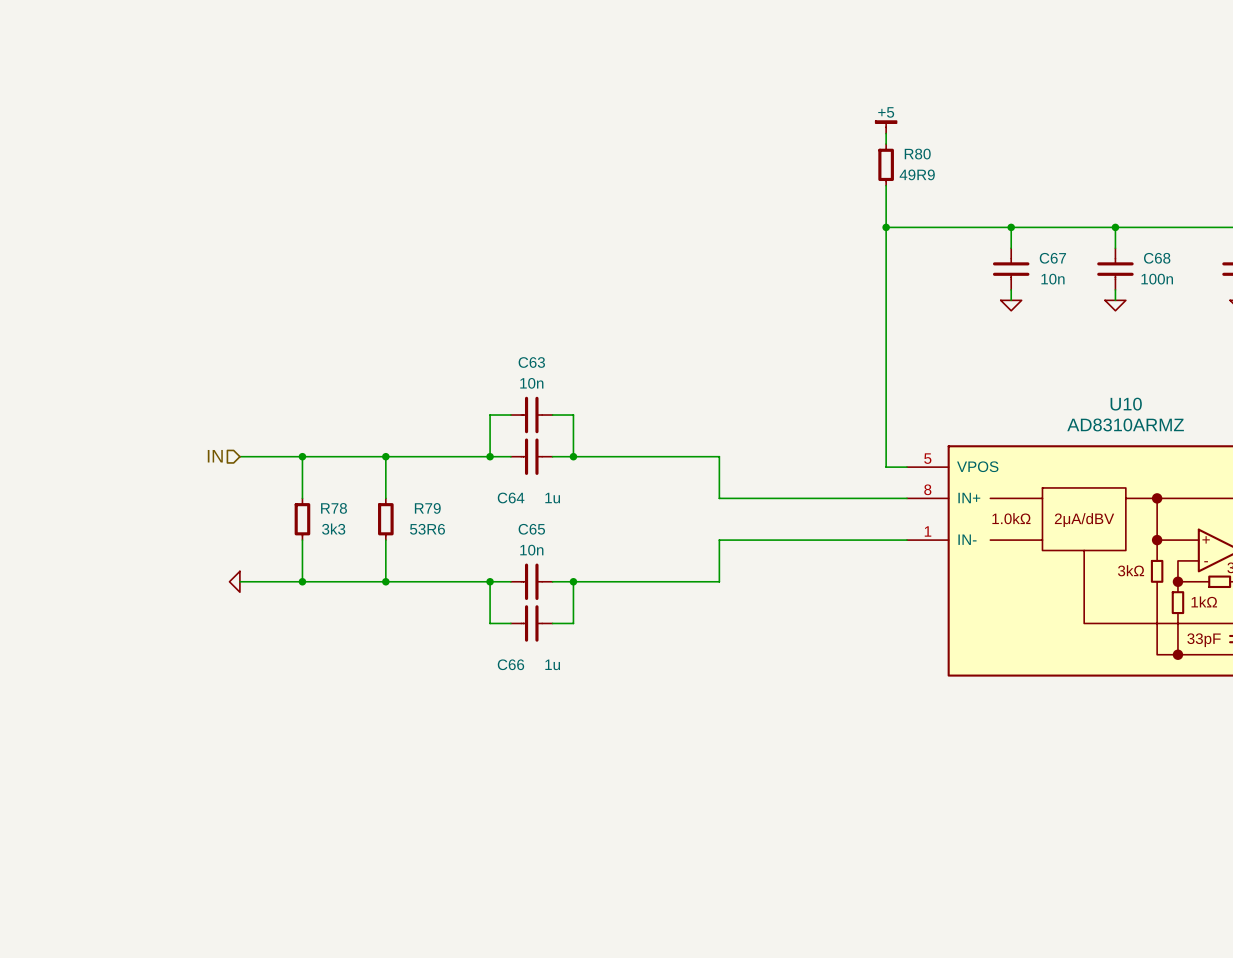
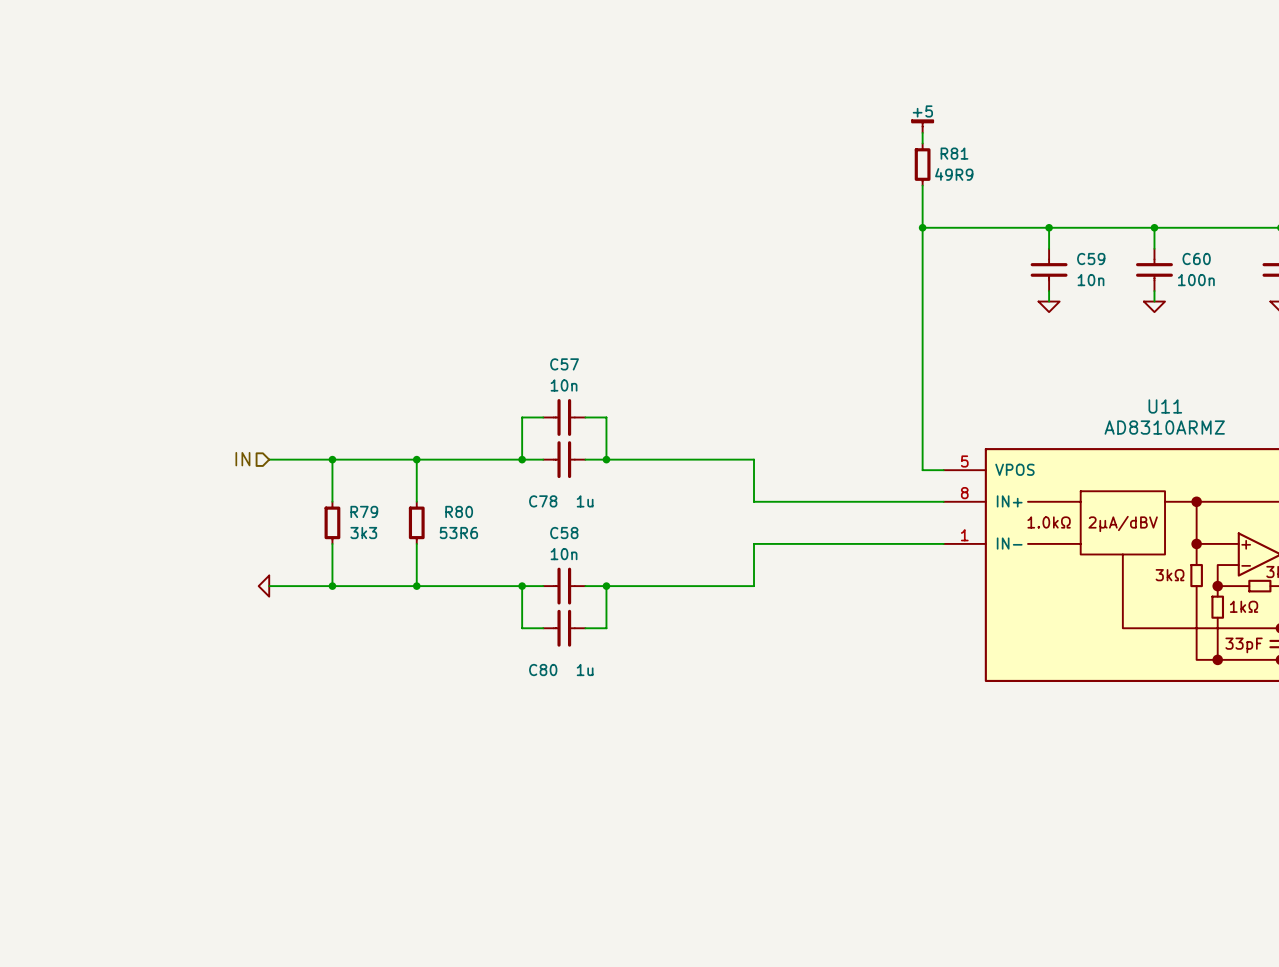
R80 name: R80 (917, 154) -> R81 (954, 153)
C67 name: C67 (1052, 258) -> C59 (1091, 259)
C68 name: C68 (1157, 258) -> C60 (1196, 259)
C63 name: C63 (531, 362) -> C57 (564, 364)
U10 name: U10 (1126, 404) -> U11 (1165, 406)
C64 name: C64 (511, 498) -> C78 (543, 501)
R78 name: R78 (334, 508) -> R79 (364, 511)
R79 name: R79 (427, 508) -> R80 (459, 511)
C65 name: C65 (531, 529) -> C58 (564, 533)
C66 name: C66 (510, 664) -> C80 (543, 670)

